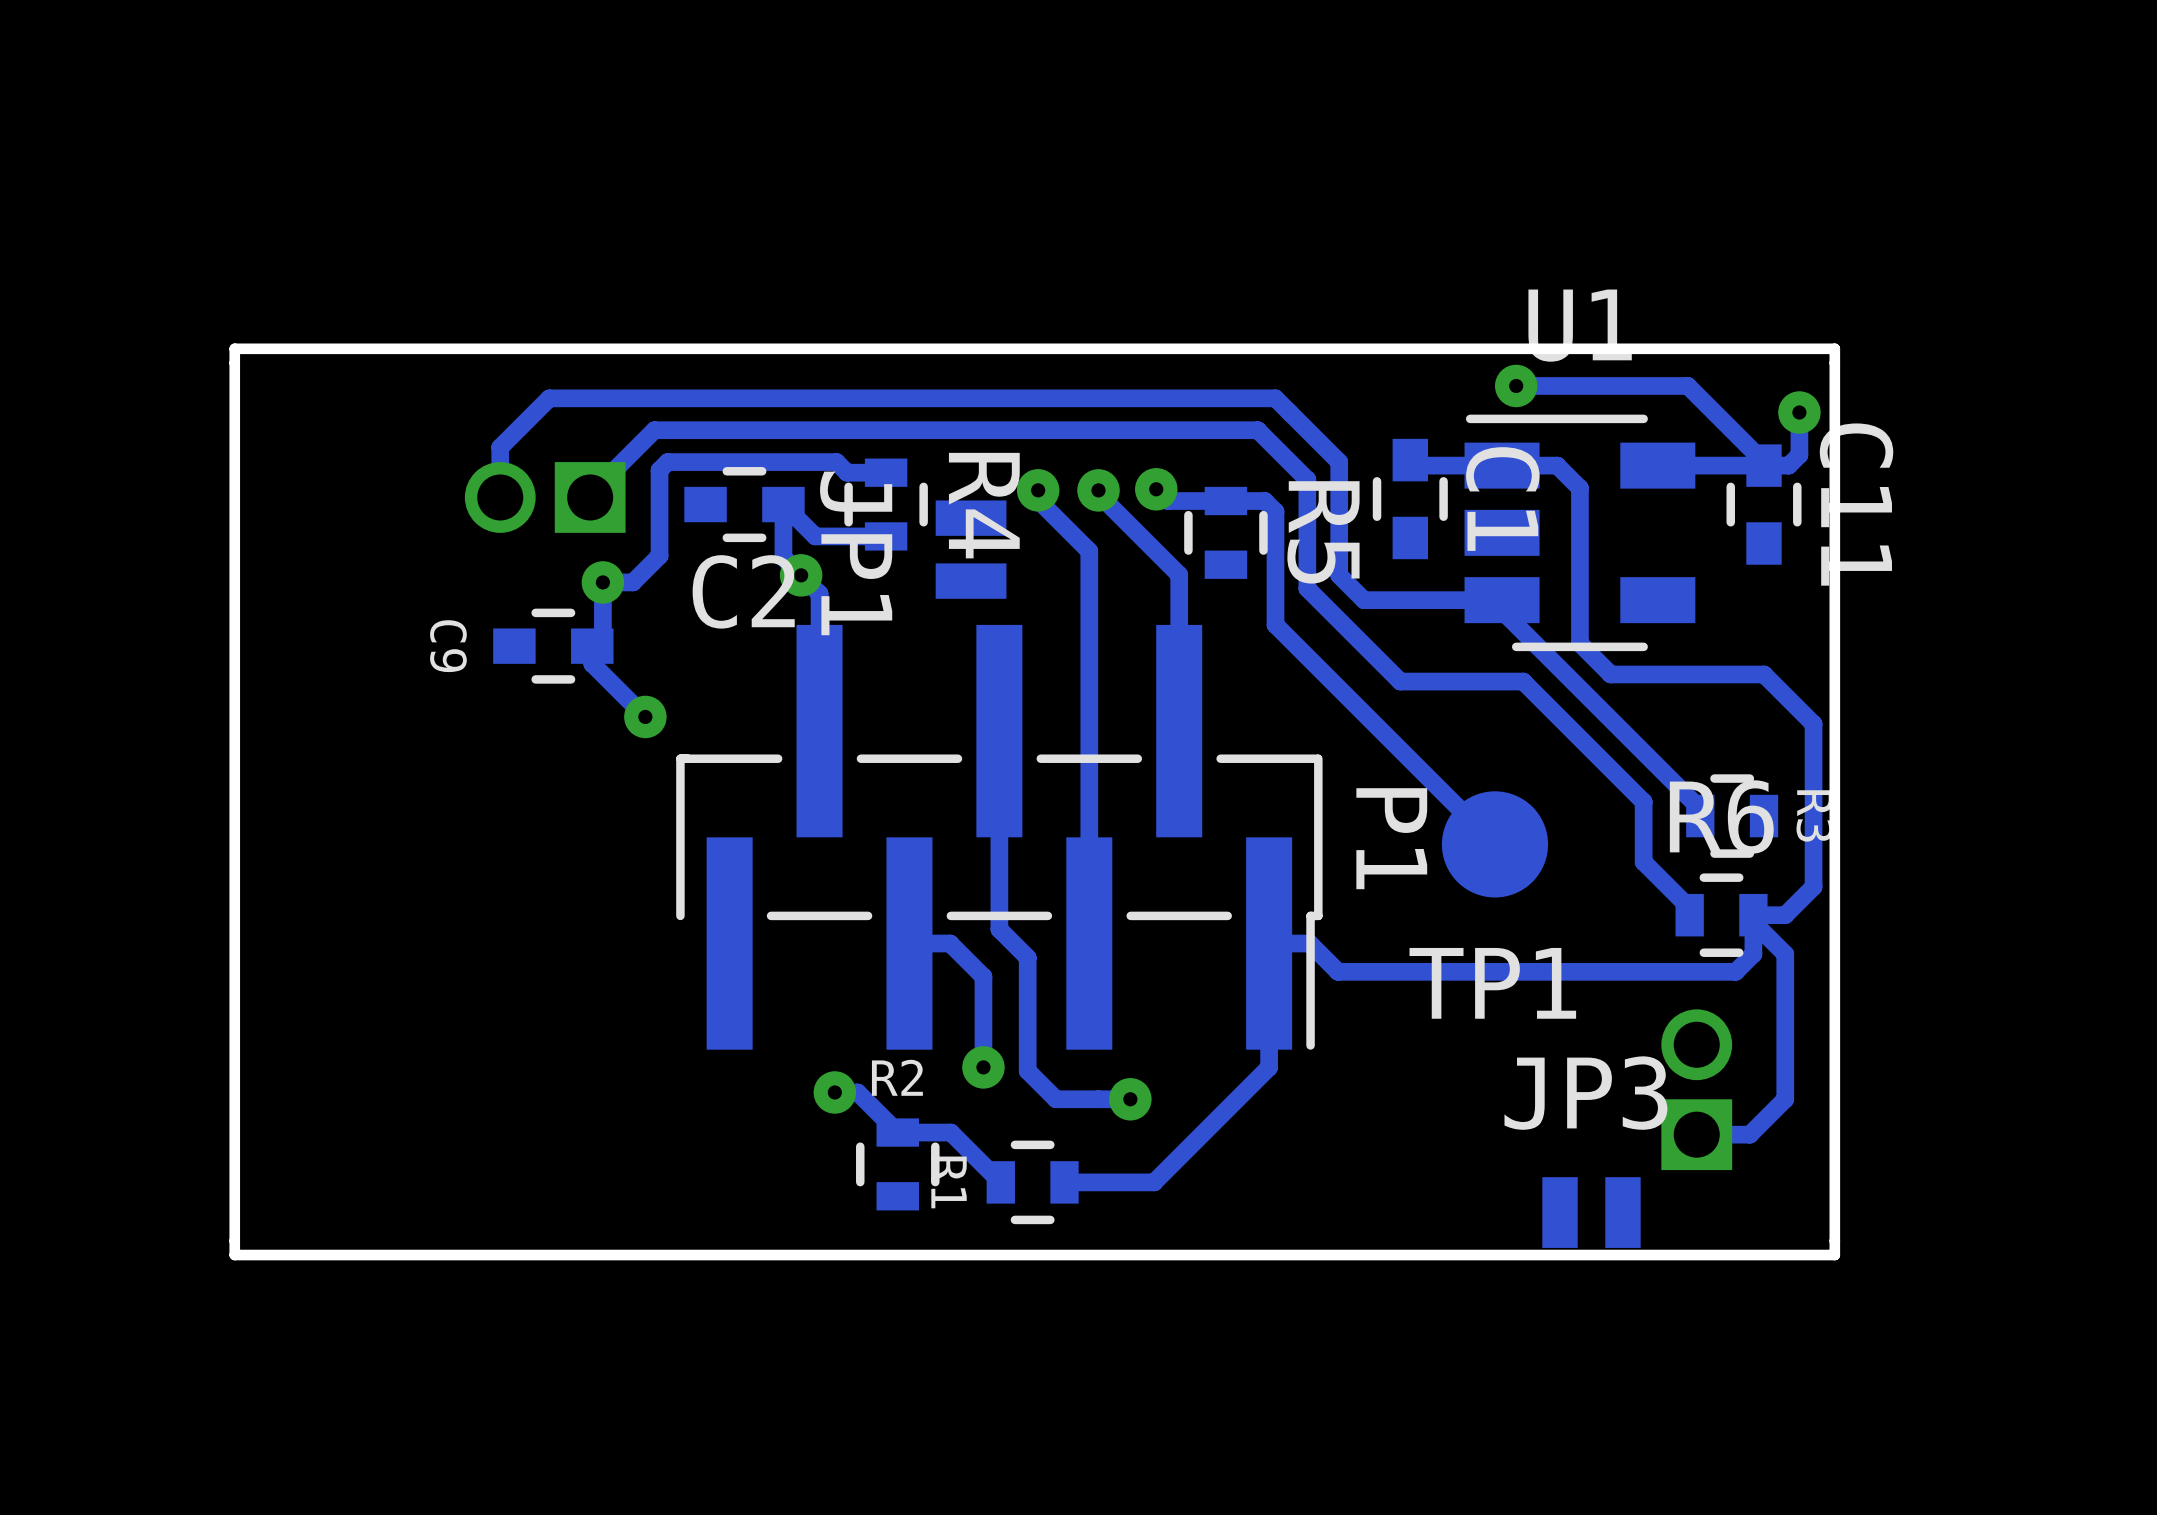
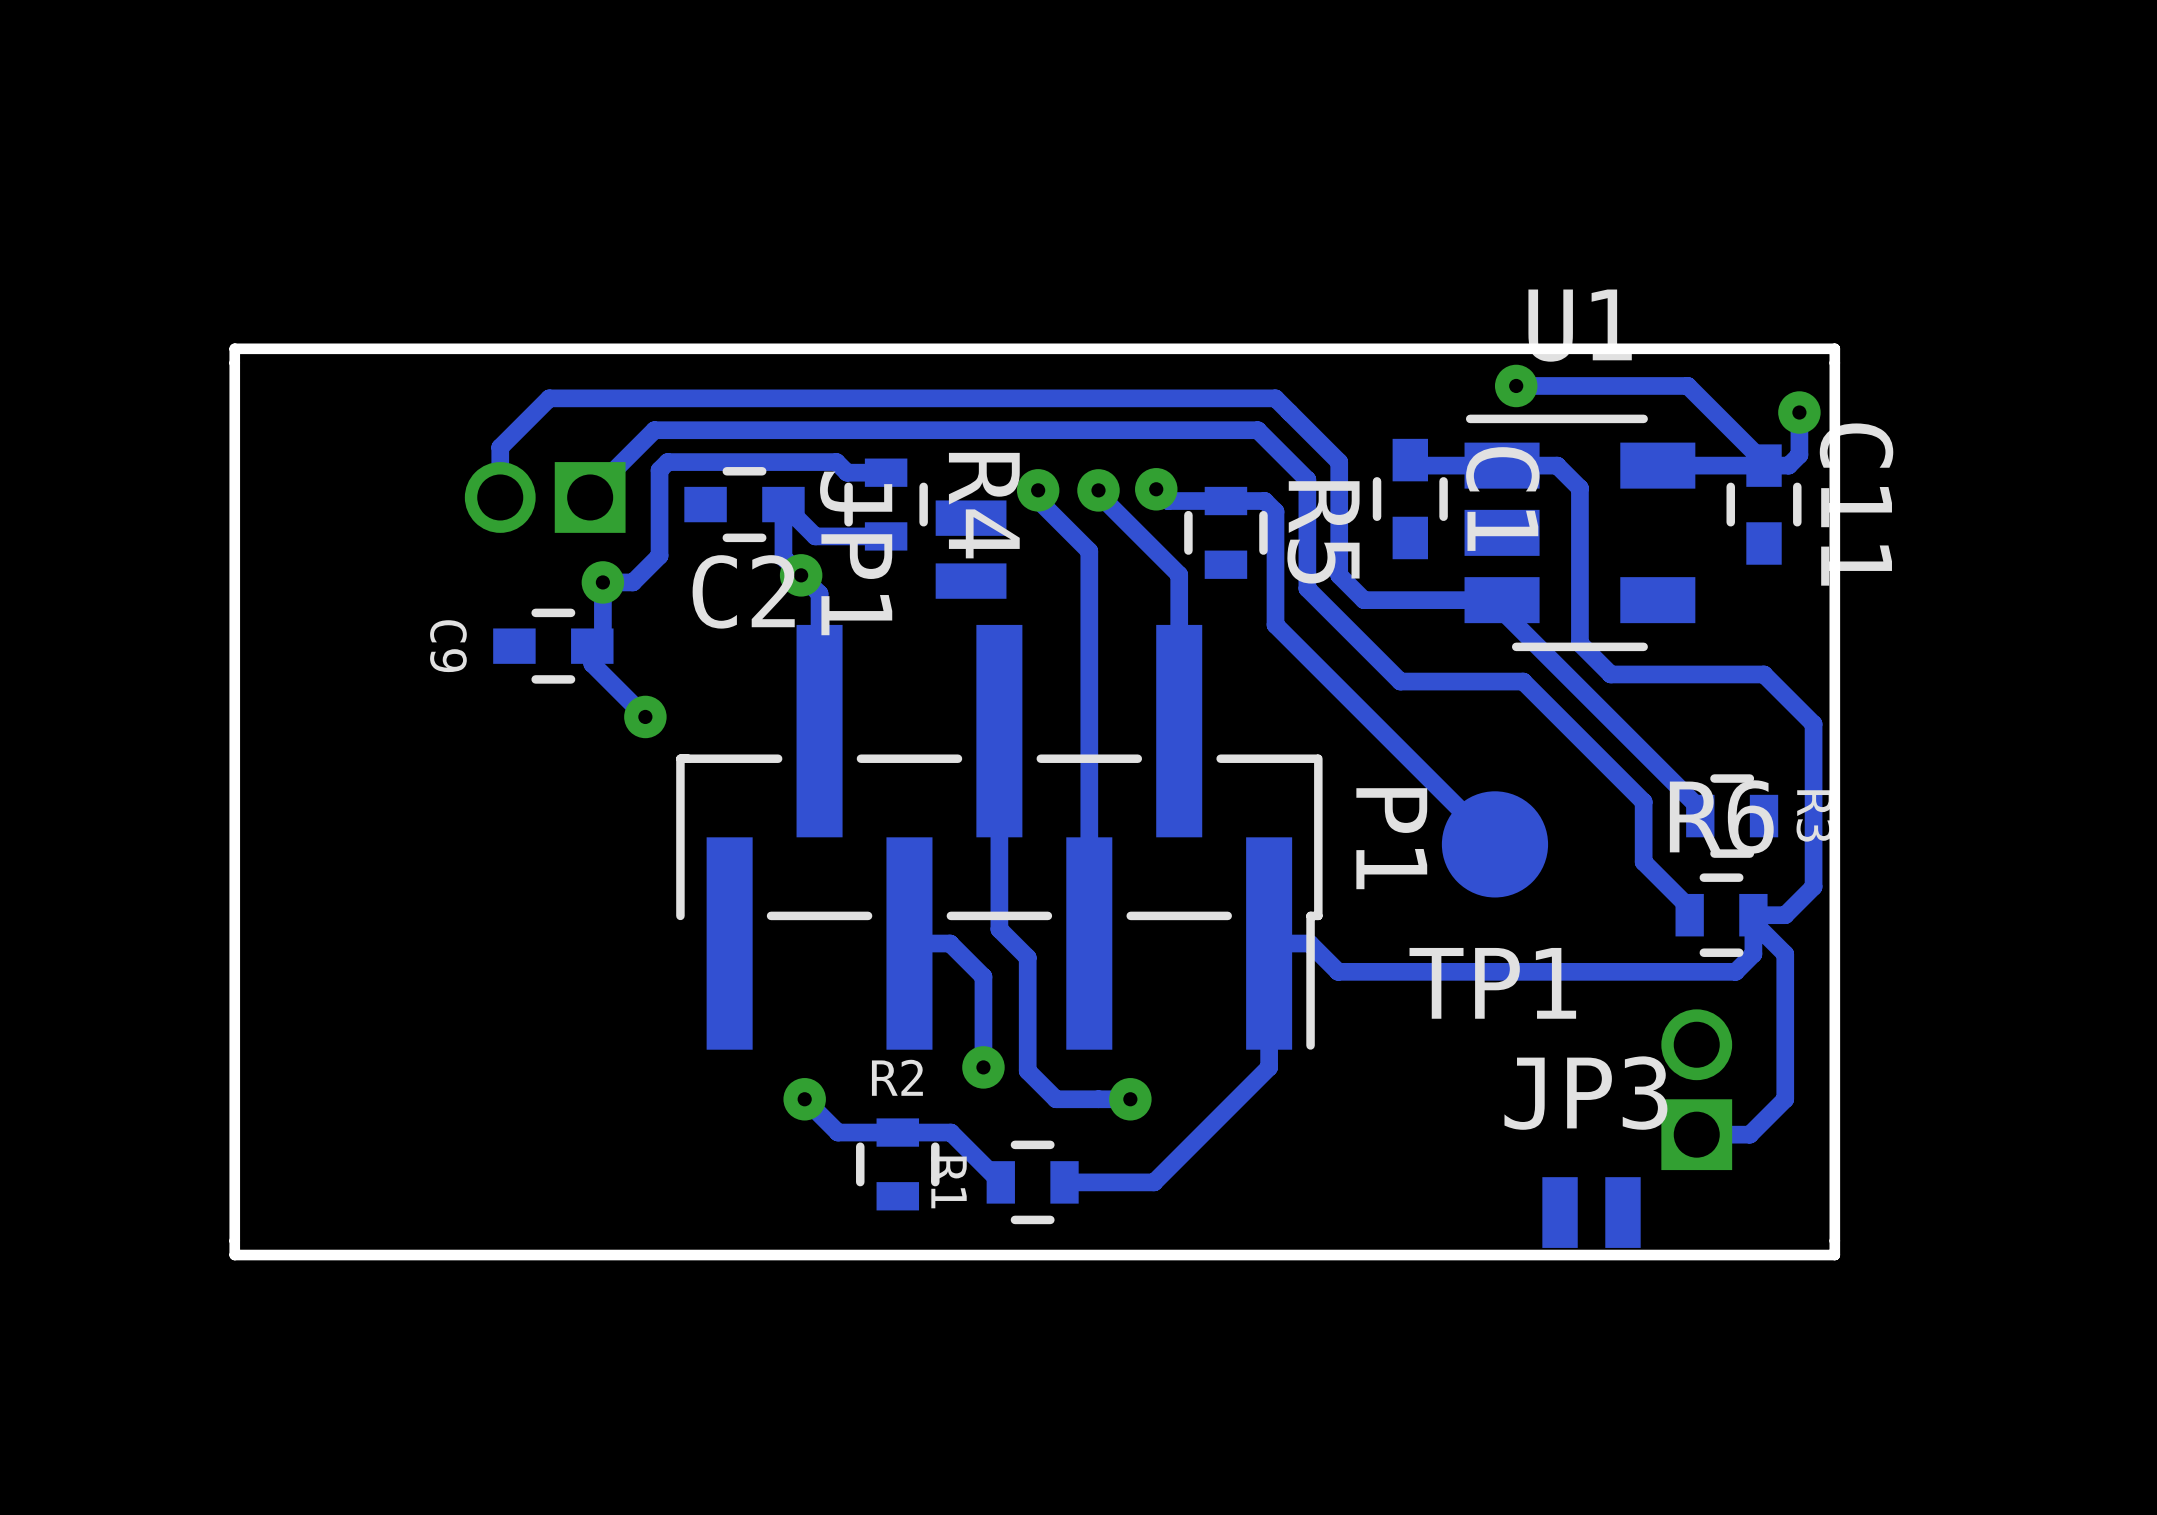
track: (834, 1092) (857, 1092) (897, 1132) -> (804, 1099) (837, 1132) (897, 1132)
via position: (834, 1092) -> (804, 1099)

